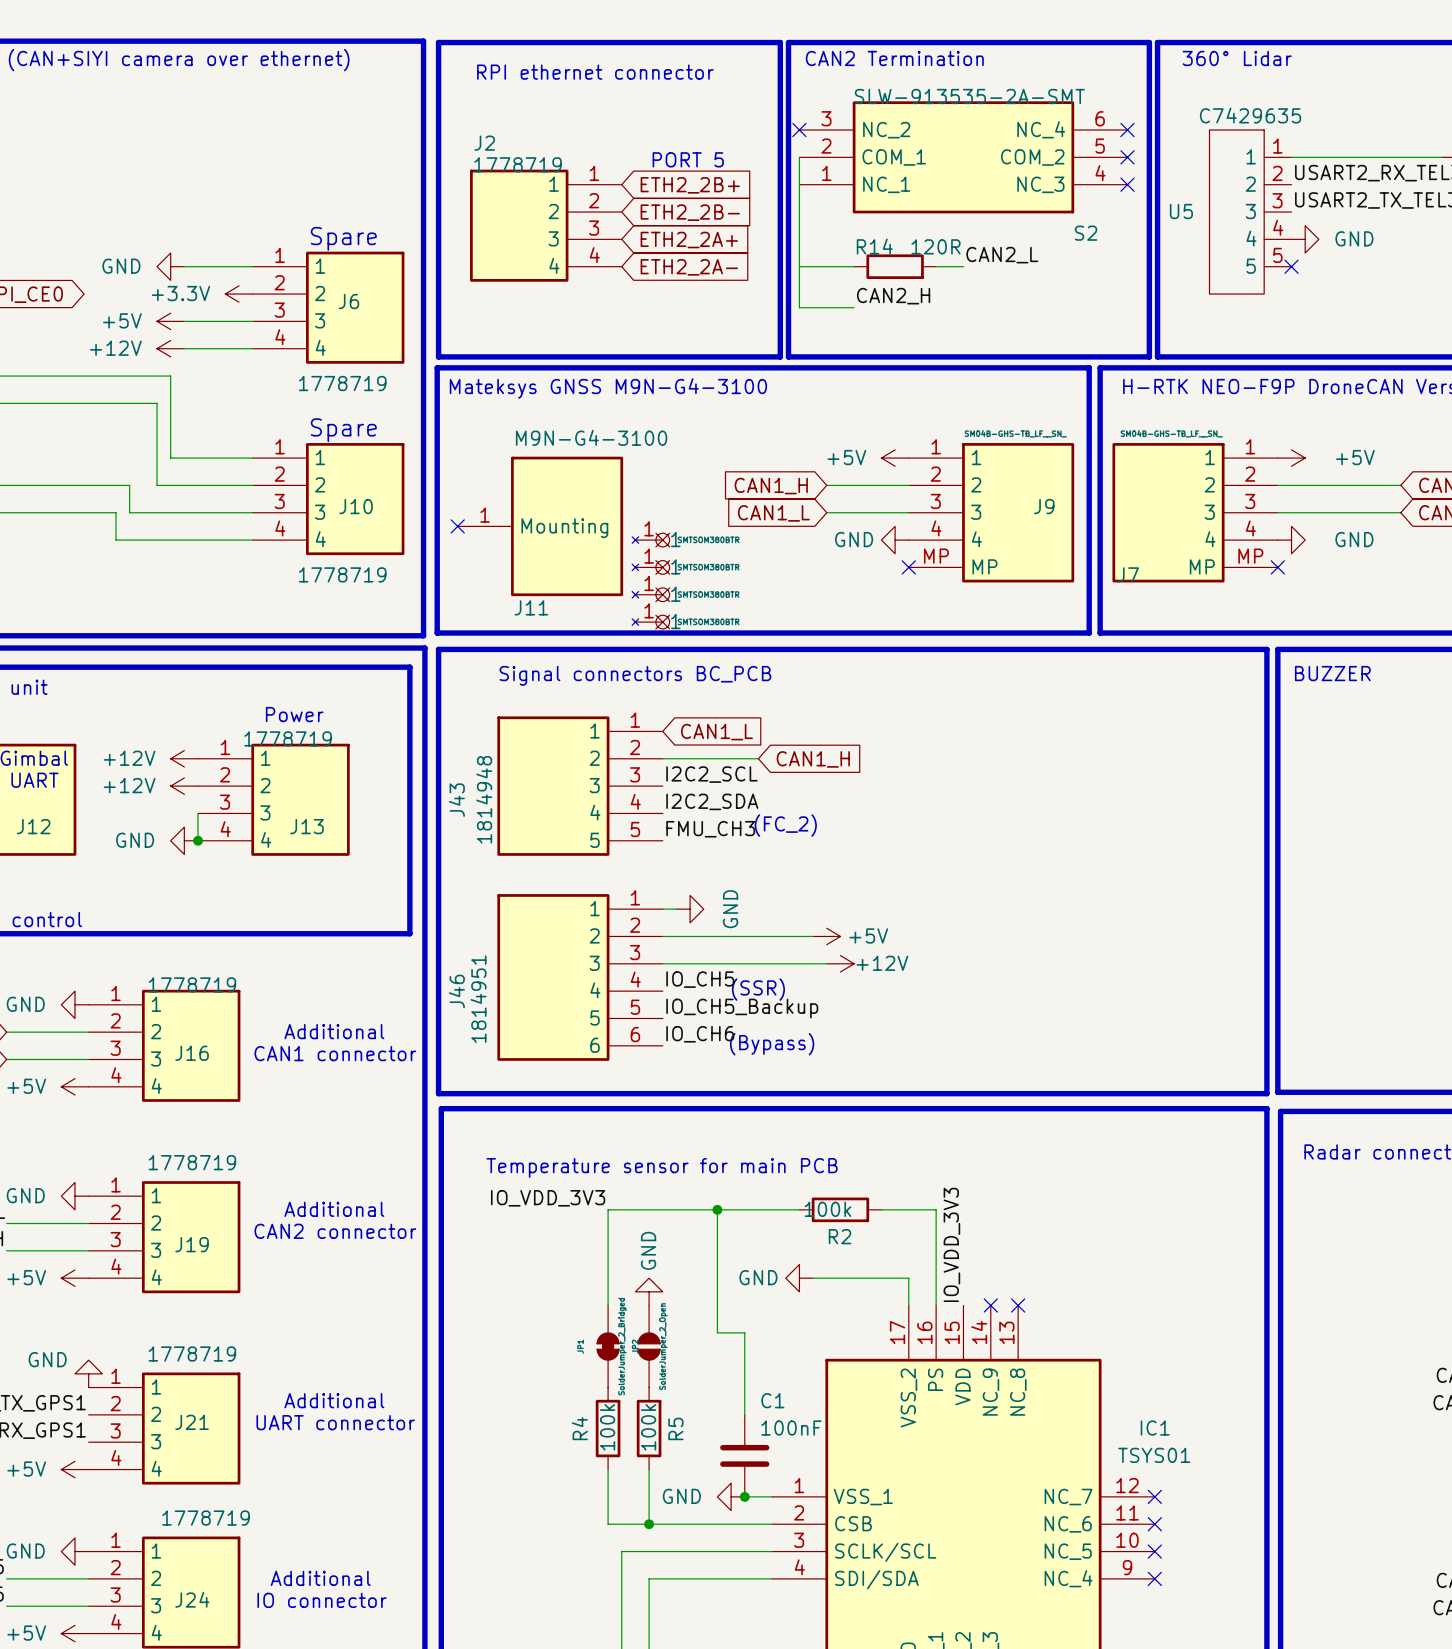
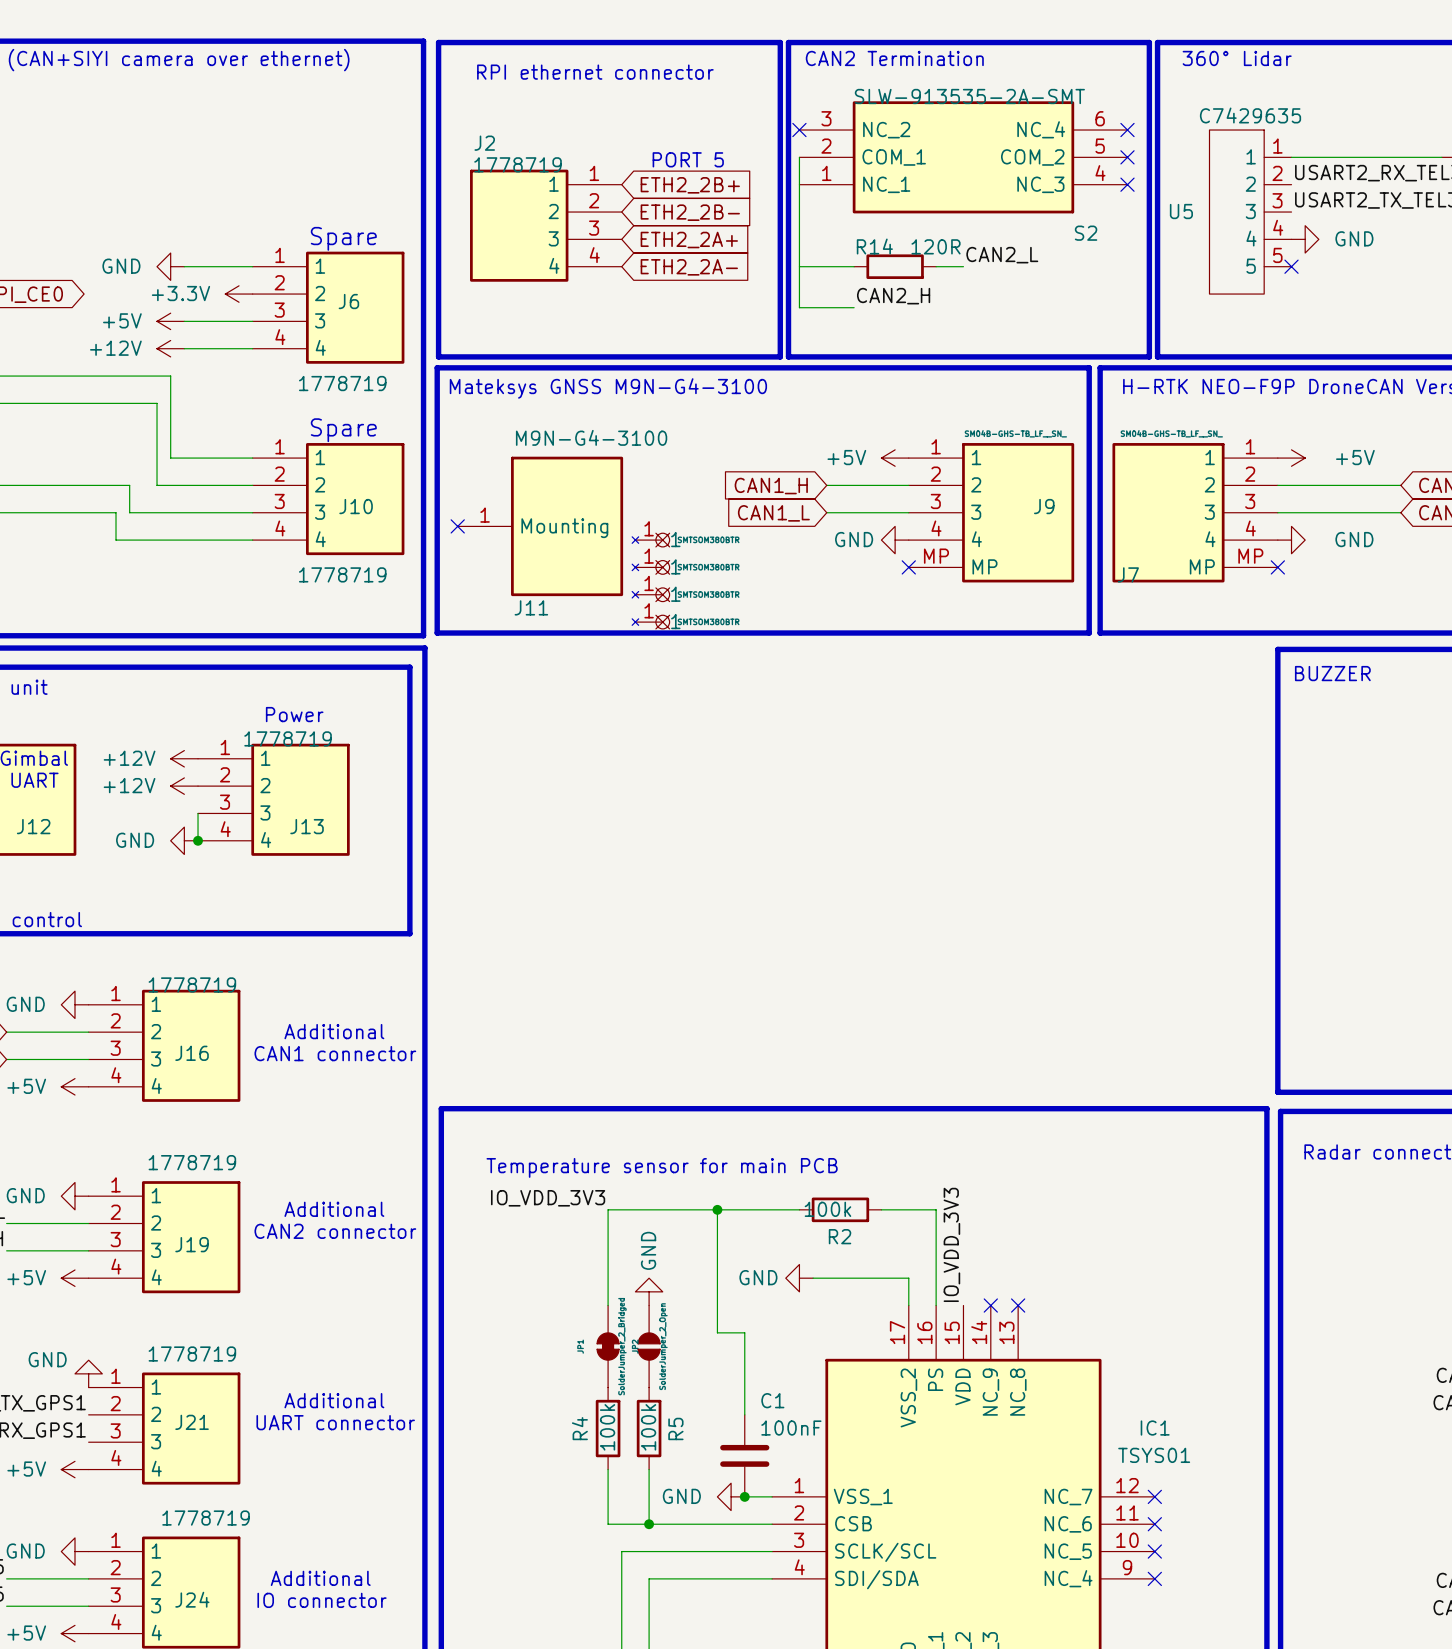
line: (438, 649) (1266, 649) (1266, 1093) (438, 1093) (438, 649) -> none
text: Signal connectors BC_PCB (635, 675) -> none
global label: CAN1_L (716, 732) -> none
wire: (662, 758) (758, 758) -> none
global label: CAN1_H (813, 759) -> none
label: I2C2_SCL (711, 774) -> none
J43: 1814948 (580, 786) -> none
label: I2C2_SDA (712, 801) -> none
text: (FC_2) (785, 825) -> none
label: FMU_CH3 (710, 829) -> none
wire: (662, 909) (676, 909) -> none
power symbol: GND (690, 909) -> none
wire: (662, 936) (813, 936) -> none
power symbol: +5V (826, 936) -> none
wire: (662, 963) (826, 963) -> none
power symbol: +12V (840, 963) -> none
J46: 1814951 (580, 977) -> none
label: IO_CH5 (700, 979) -> none
text: (SSR) (758, 989) -> none
label: IO_CH5_Backup (742, 1008) -> none
label: IO_CH6 (700, 1034) -> none
text: (Bypass) (772, 1044) -> none

